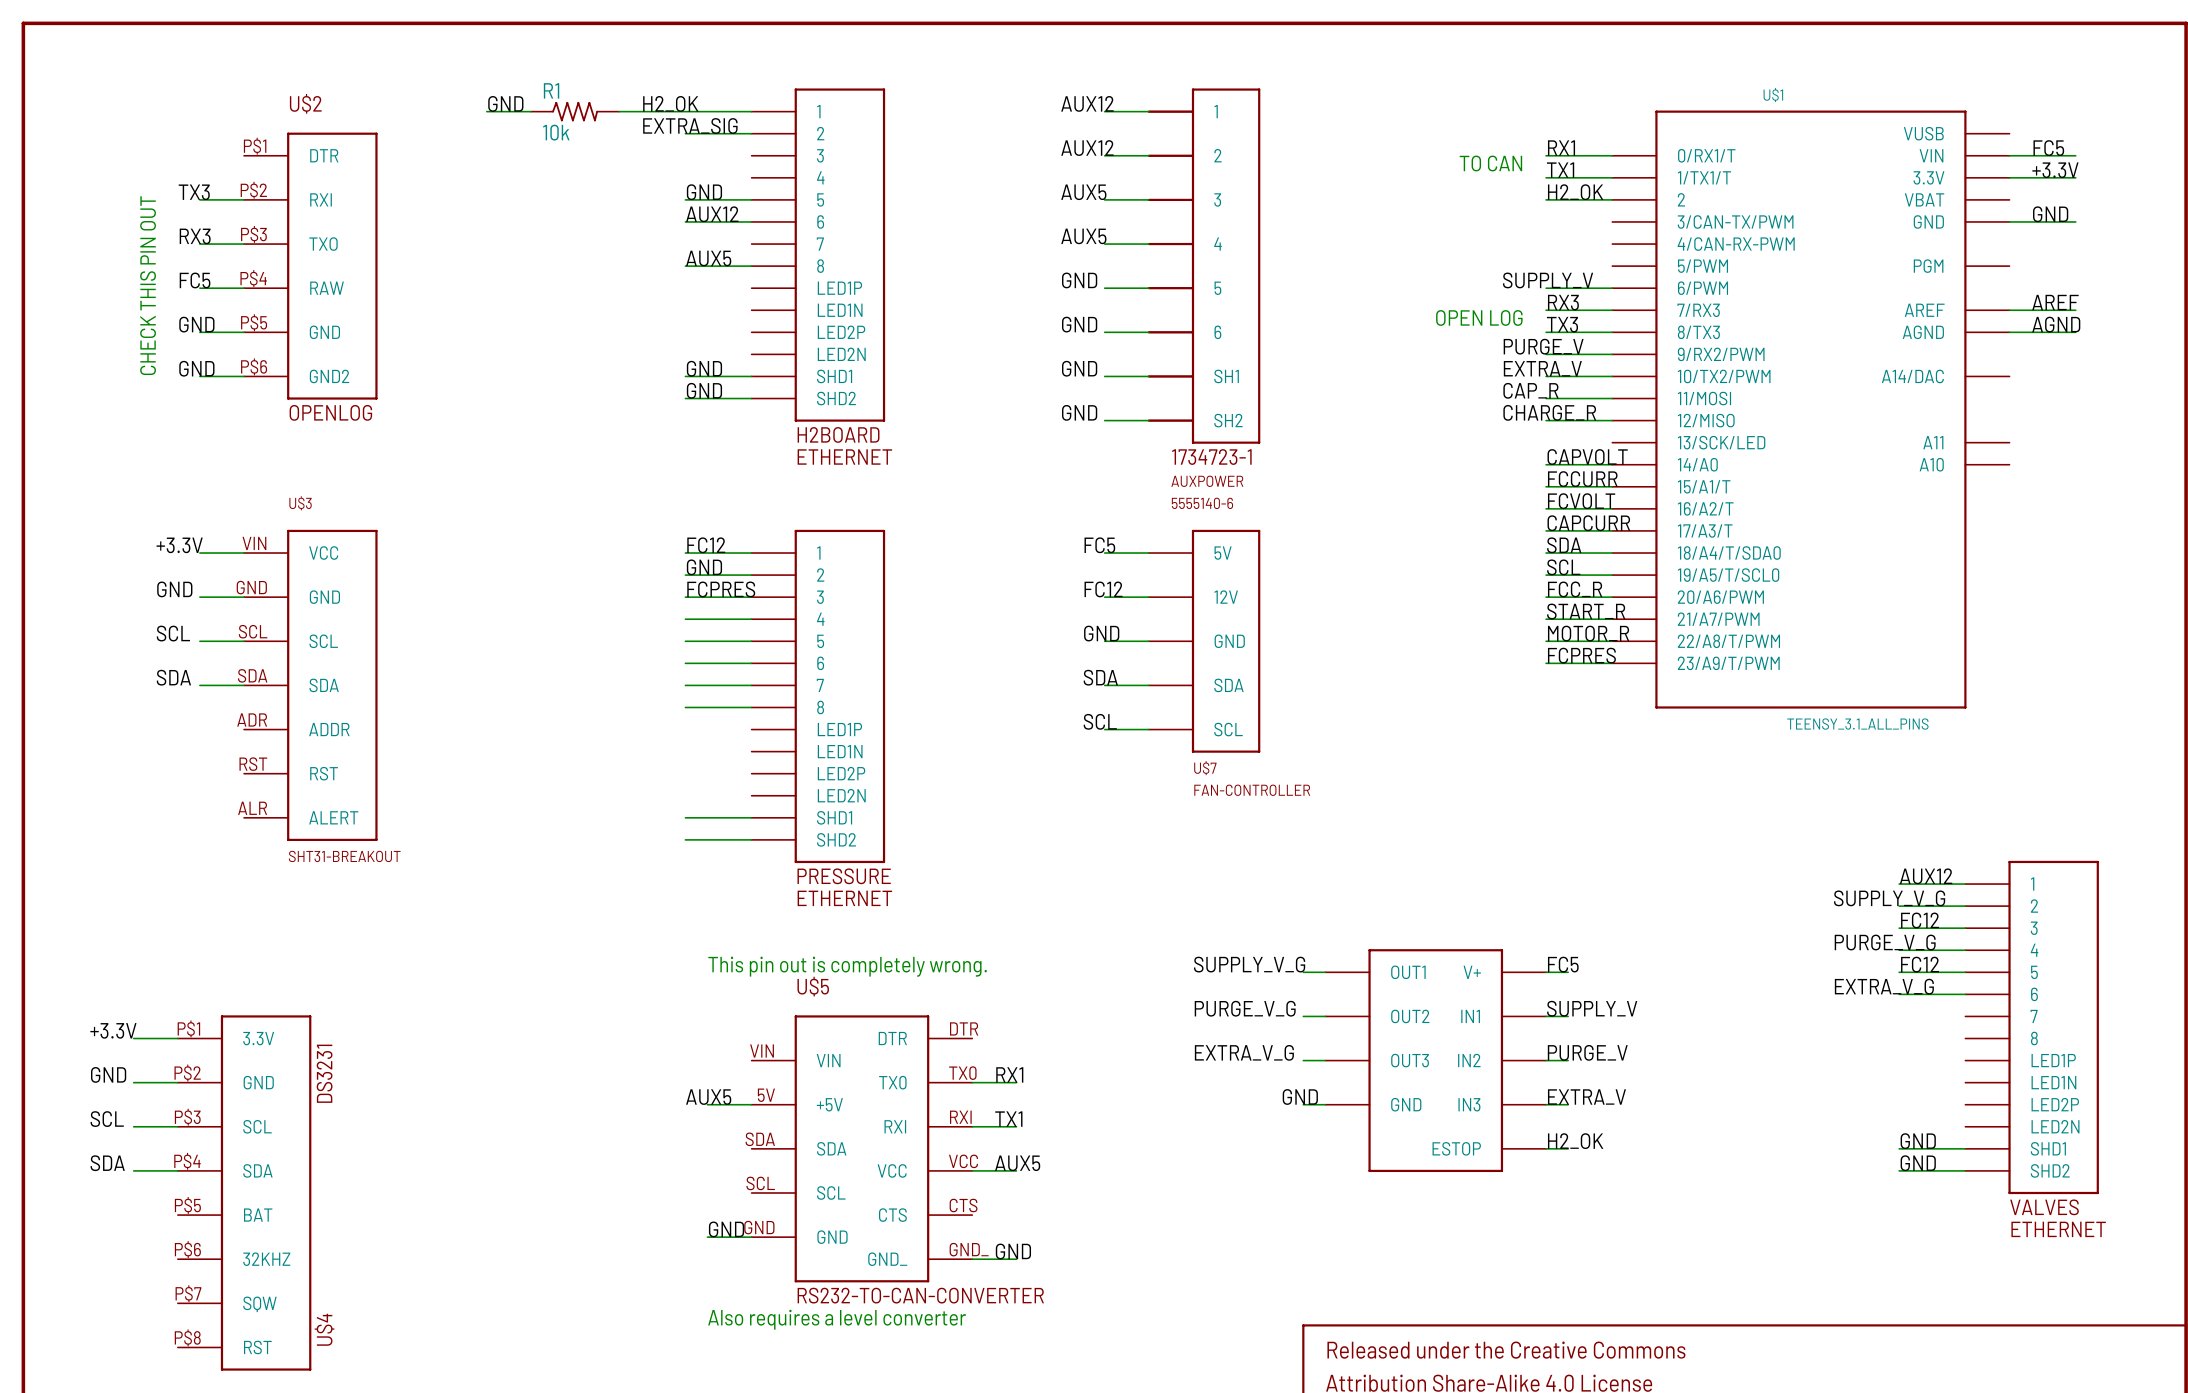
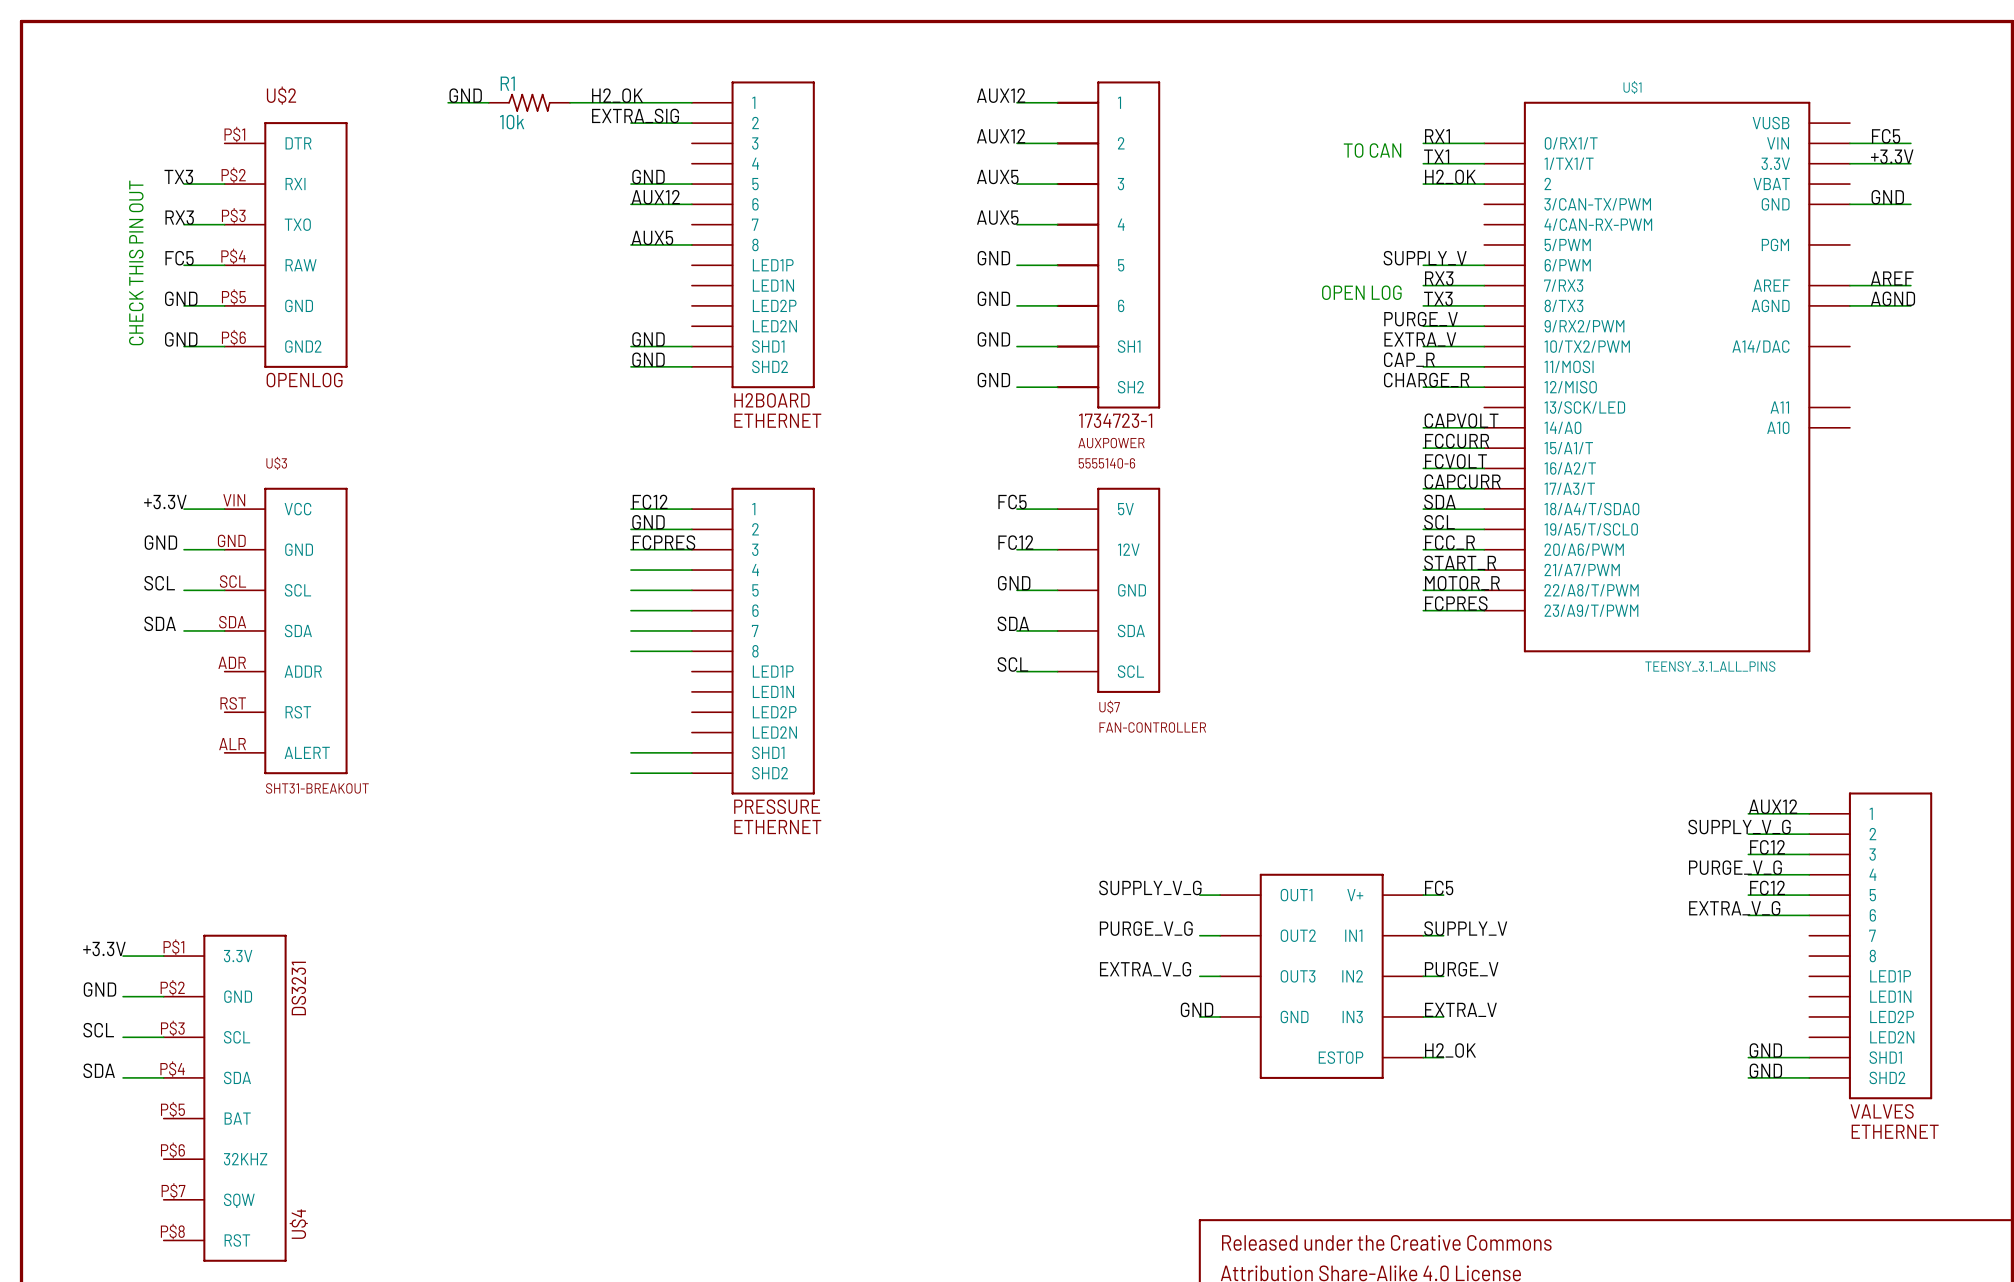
text: This pin out is completely wrong. (847, 966) -> none
label: RX1 (1009, 1074) -> none
wire: (972, 1082) (1016, 1082) -> none
label: AUX5 (708, 1097) -> none
wire: (707, 1104) (751, 1104) -> none
label: TX1 (1008, 1119) -> none
wire: (972, 1126) (1016, 1126) -> none
U$5: RS232-TO-CAN-CONVERTER (861, 1148) -> none
label: AUX5 (1017, 1163) -> none
wire: (972, 1170) (1016, 1170) -> none
label: GND (726, 1229) -> none
wire: (707, 1237) (751, 1237) -> none
label: GND (1013, 1251) -> none
wire: (972, 1259) (1016, 1259) -> none
text: Also requires a level converter (837, 1319) -> none

